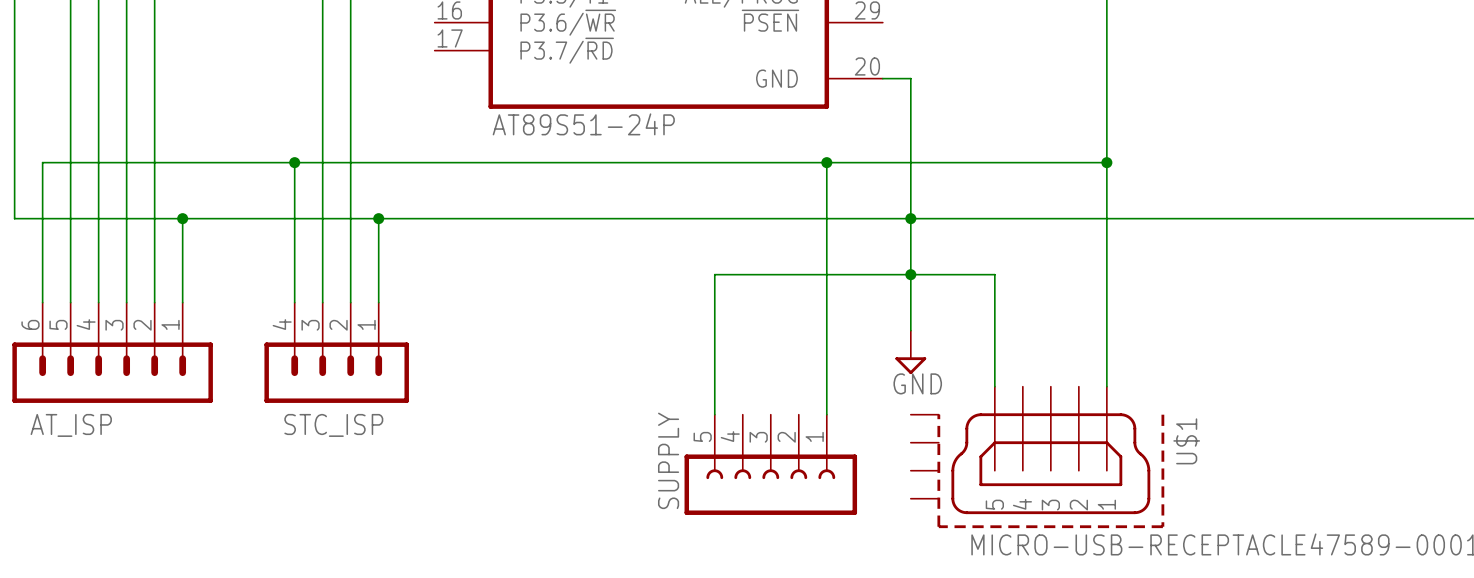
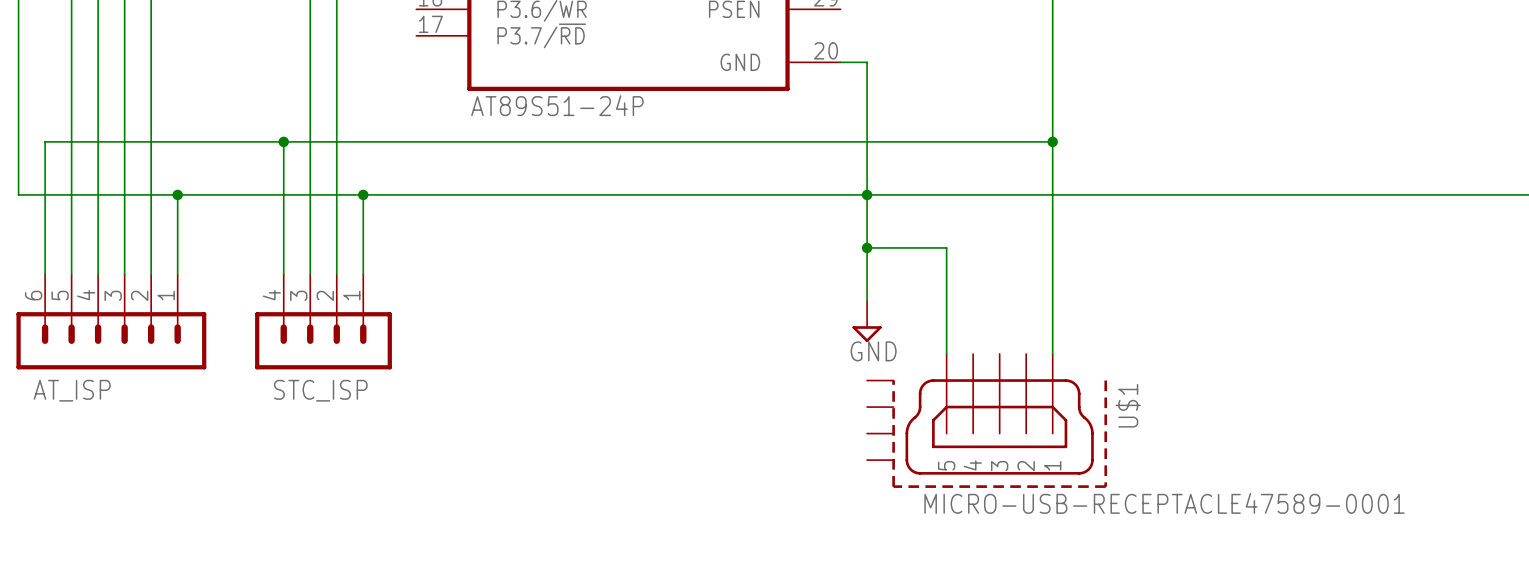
wire: (826, 162) (826, 414) -> none
junction: (826, 162) -> none
wire: (910, 274) (714, 274) (714, 414) -> none
SUPPLY: (770, 464) -> none

